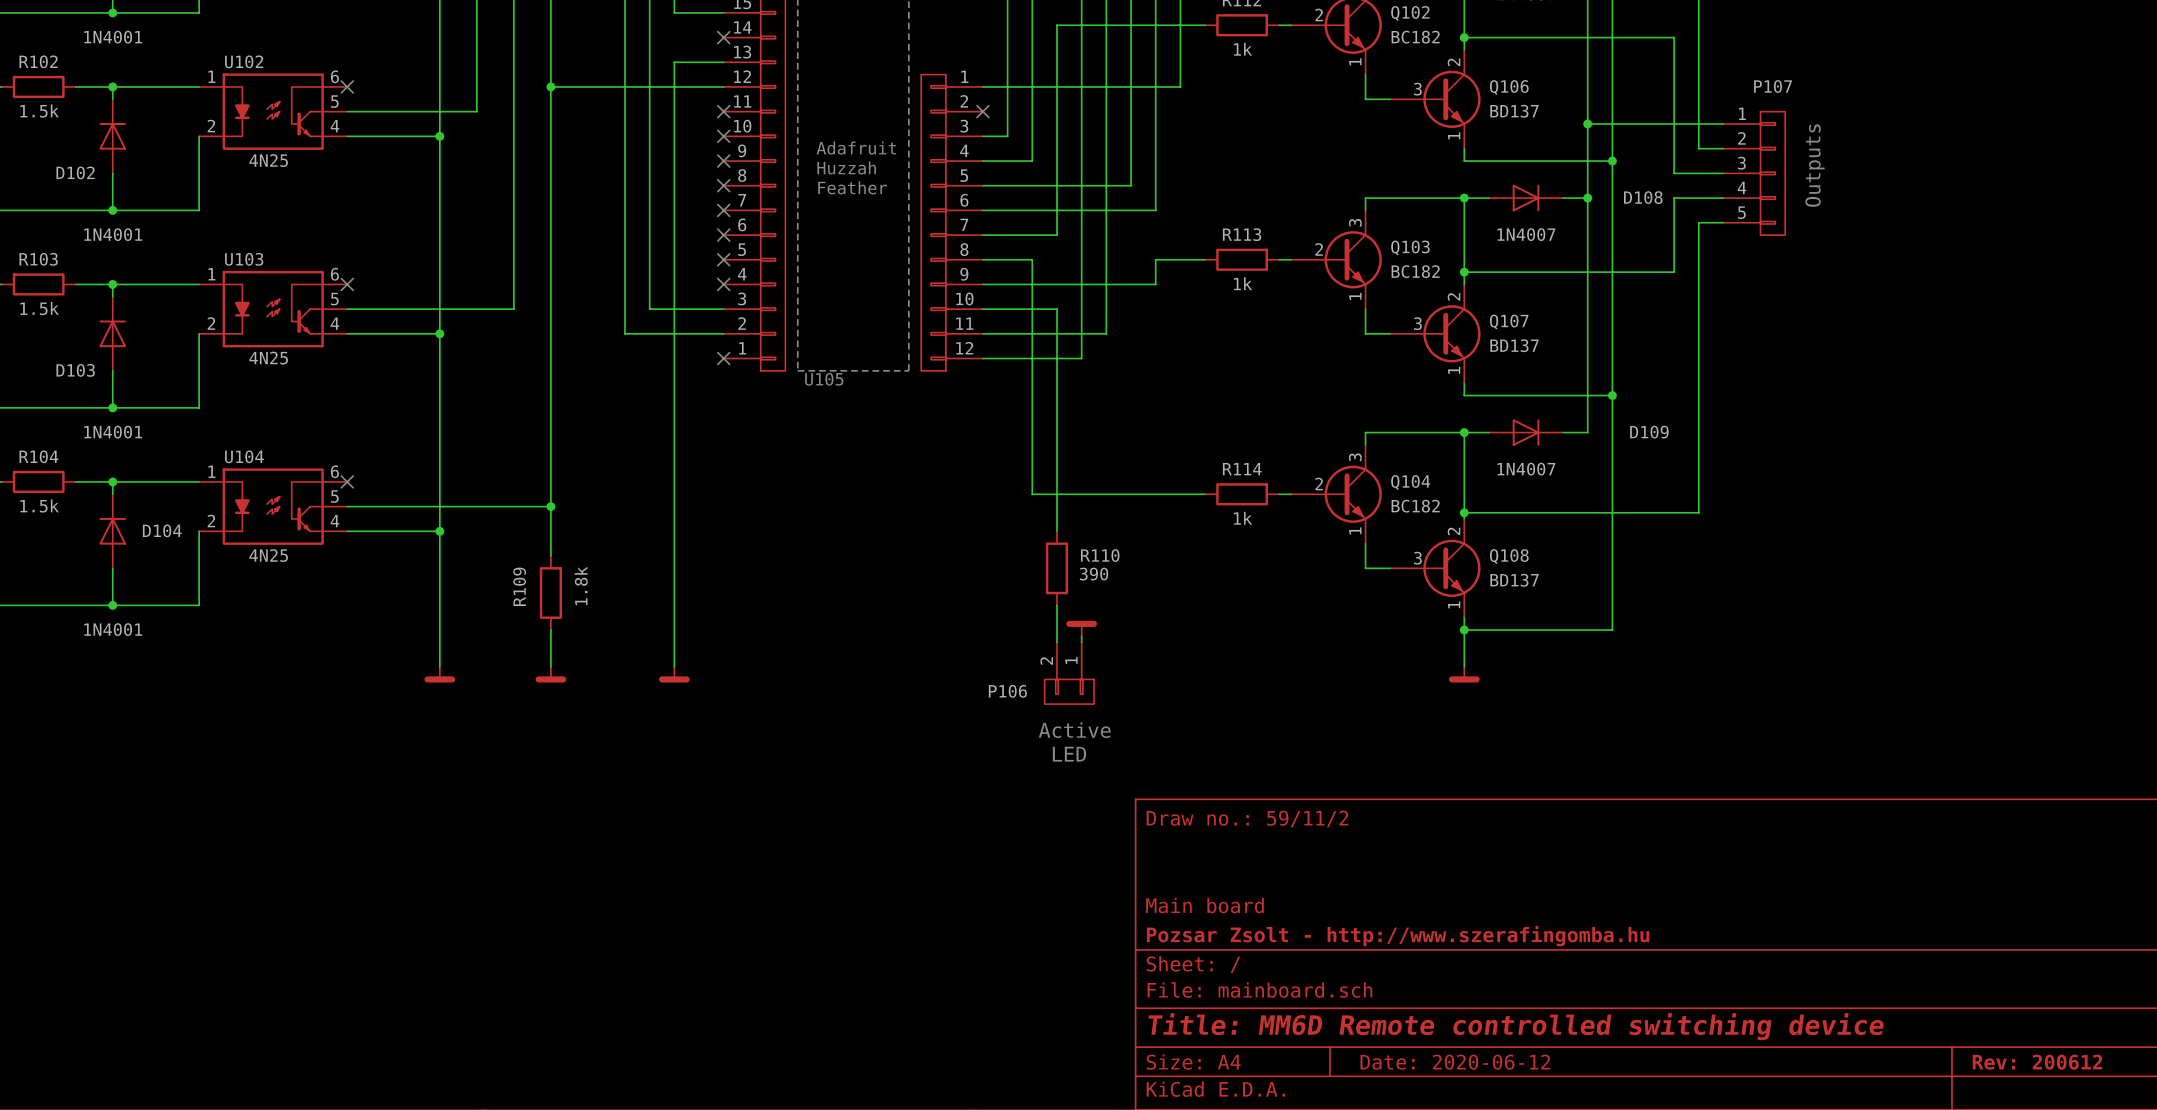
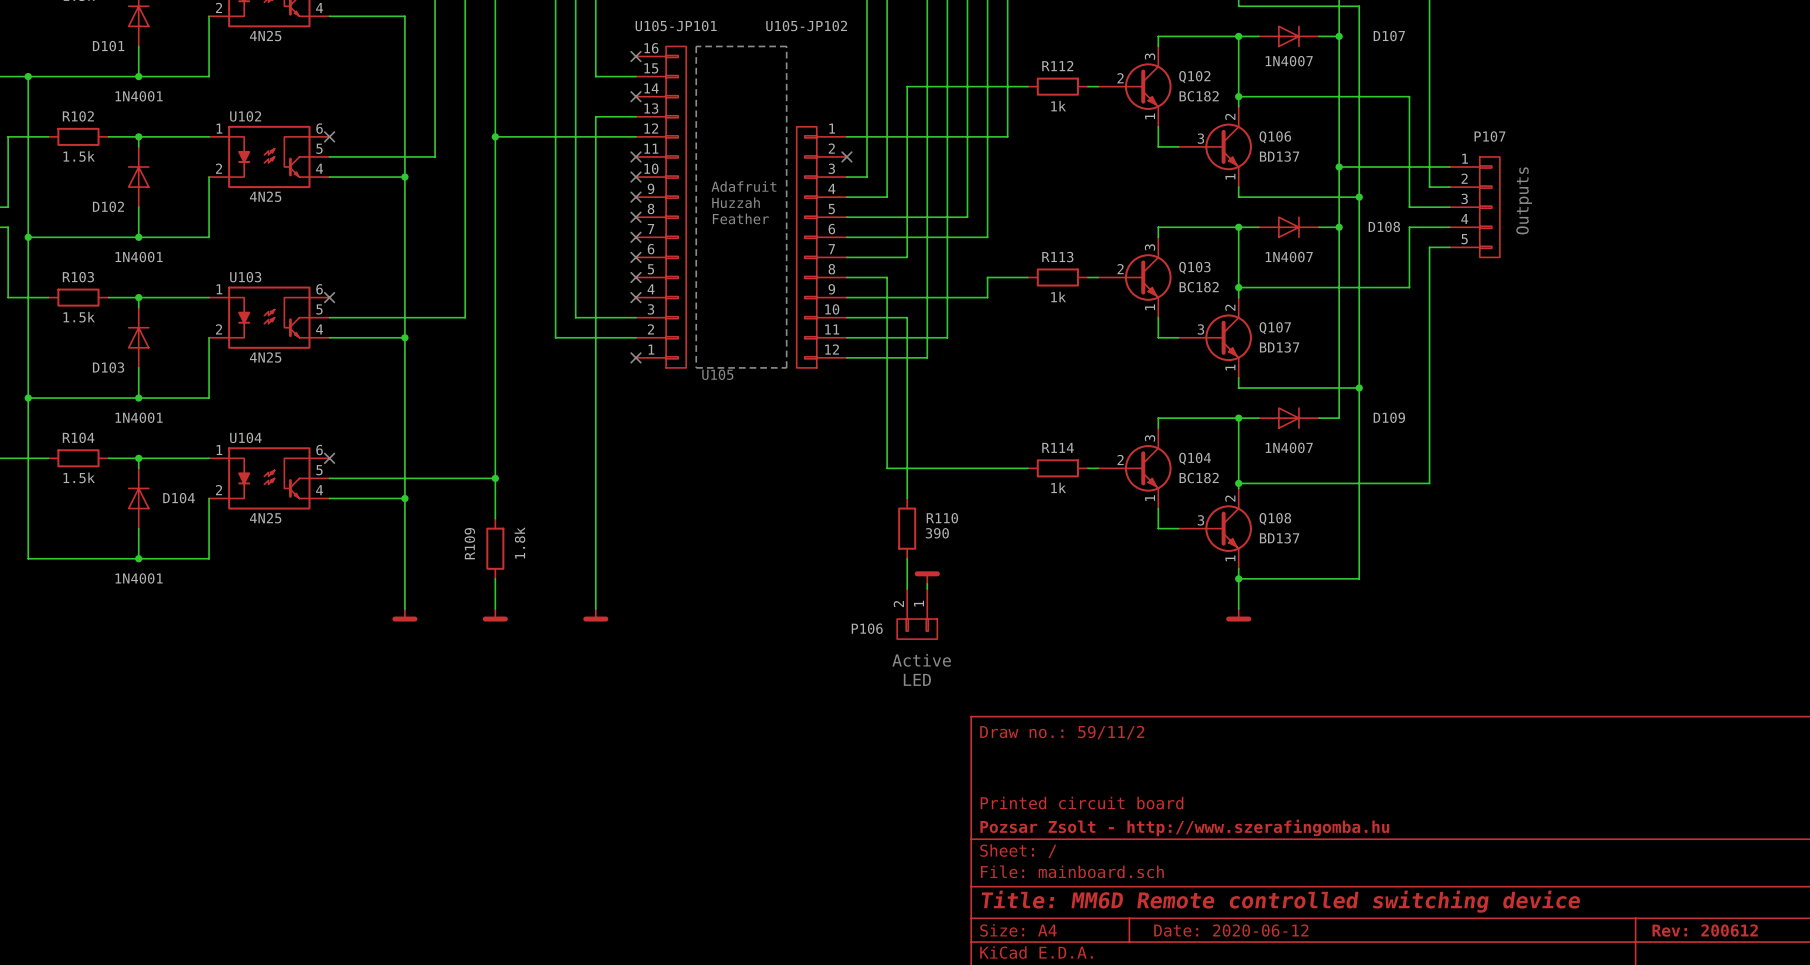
title block: Main board (1205, 905) -> Printed circuit board (1082, 803)

